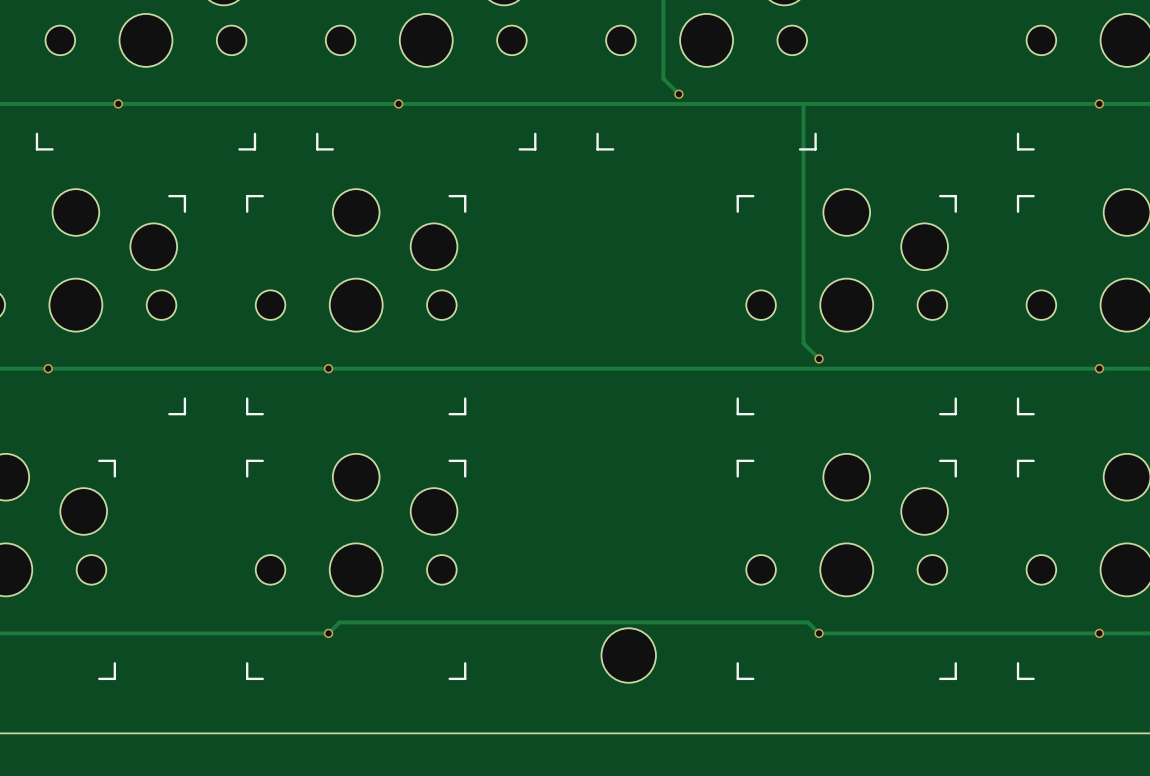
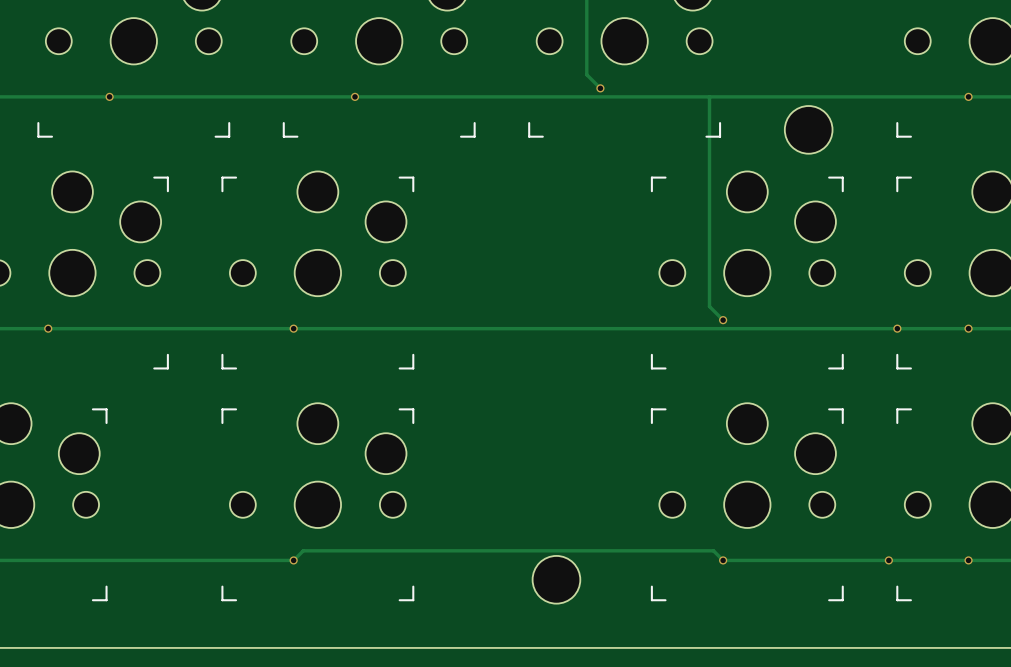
part: none -> (808, 129)
via: none -> (897, 328)
via: none -> (888, 560)

